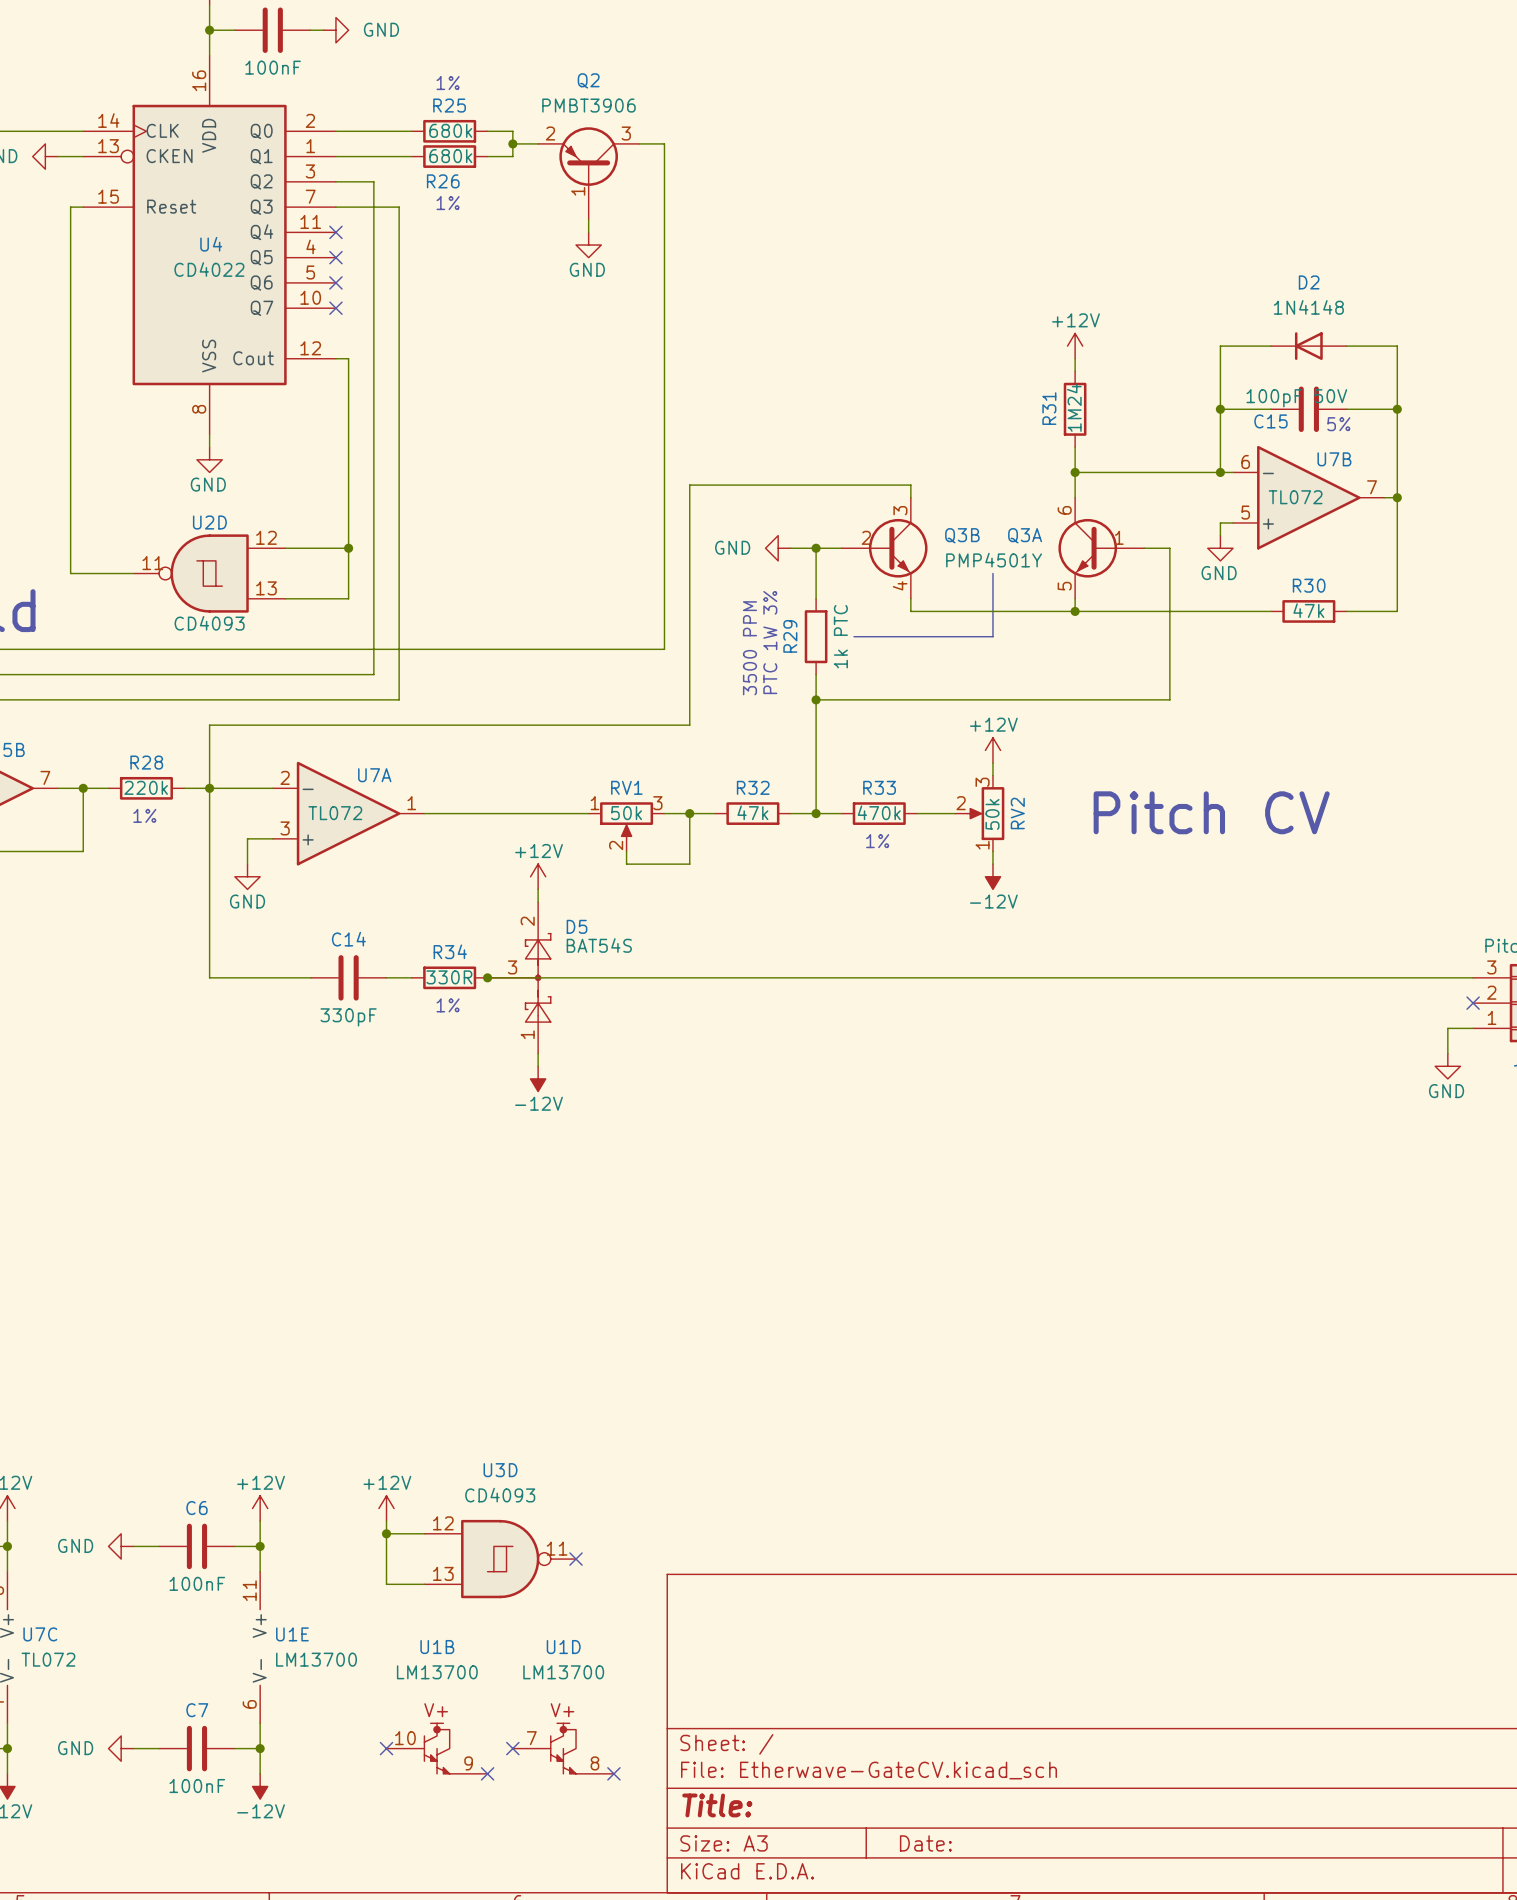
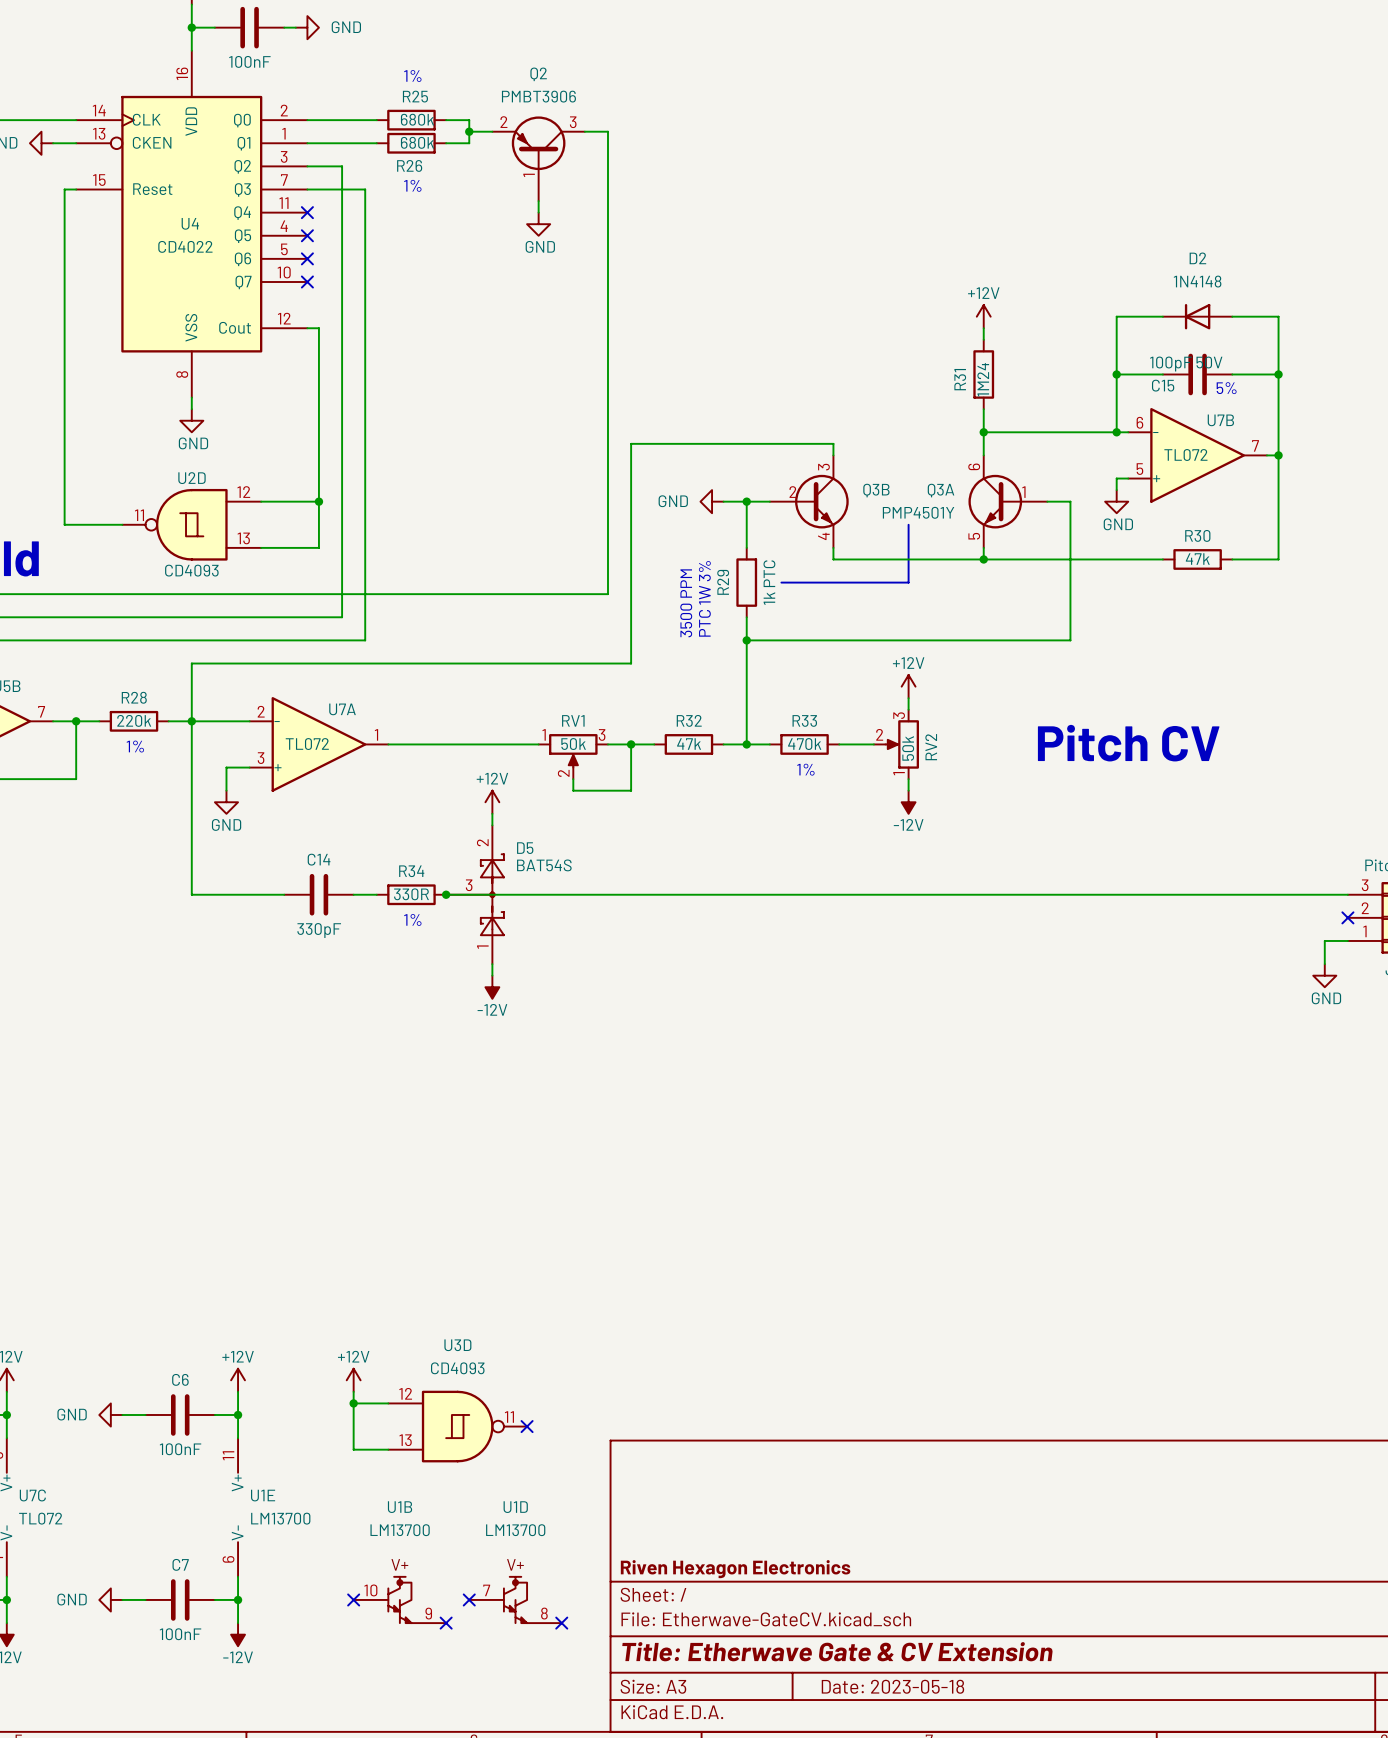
title block: none -> Riven Hexagon Electronics (735, 1569)
title block: Title: (717, 1805) -> Title: Etherwave Gate & CV Extension (837, 1651)
title block: Date: (925, 1843) -> Date: 2023-05-18 (892, 1686)

